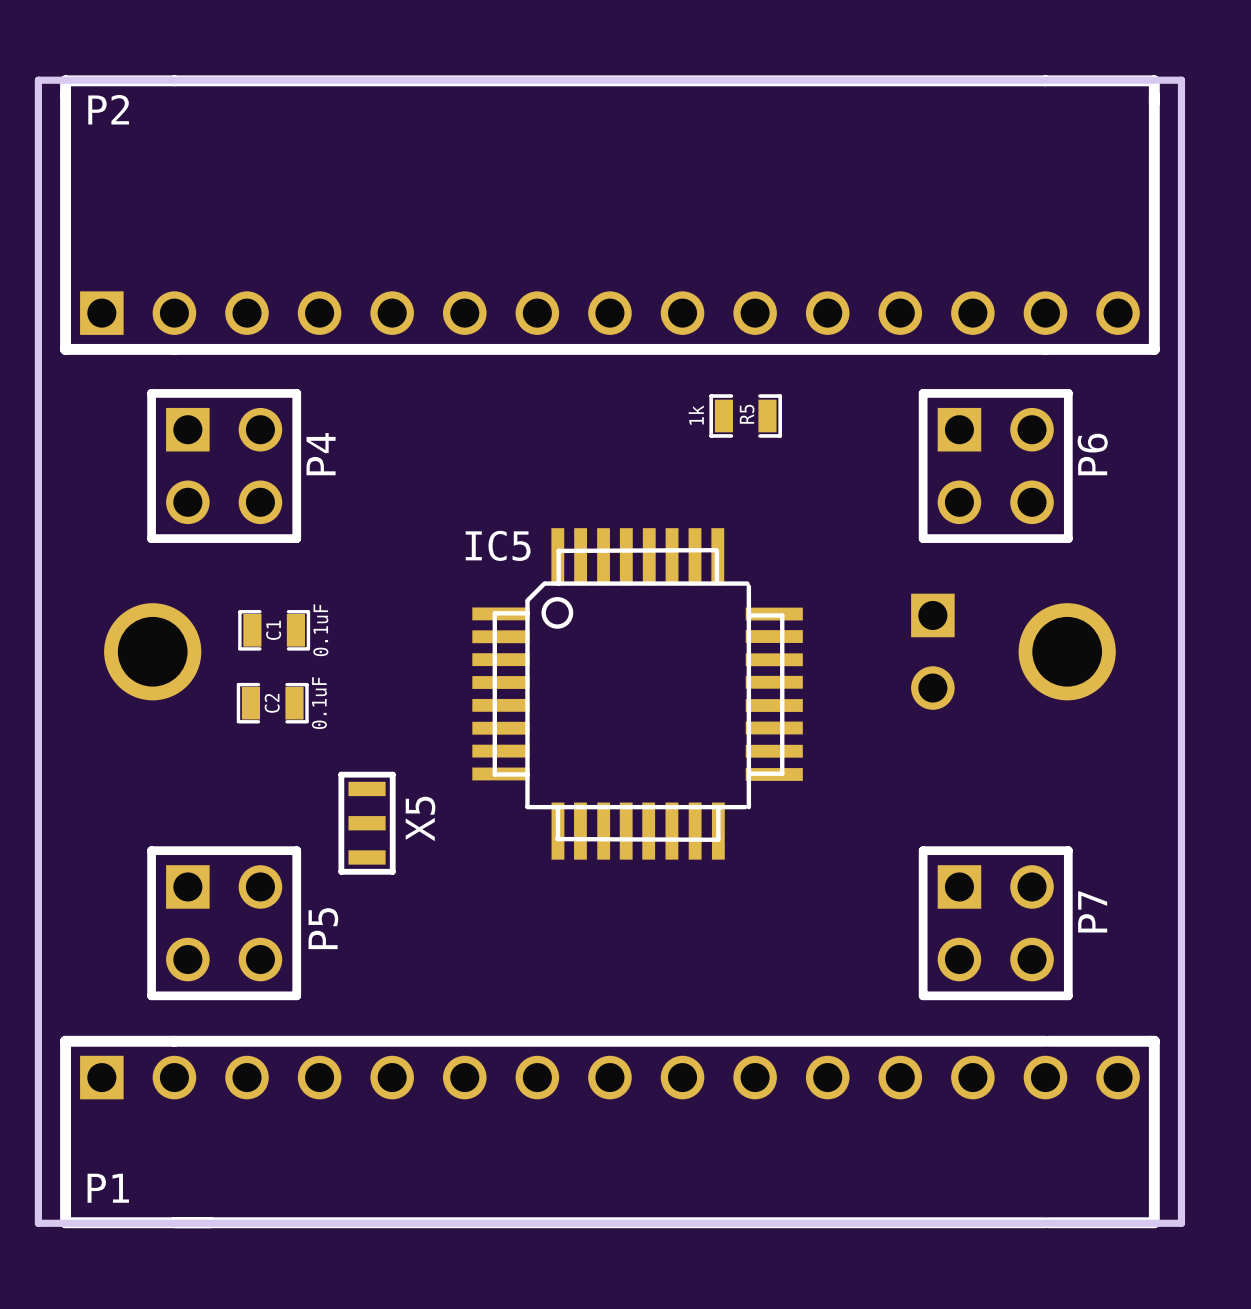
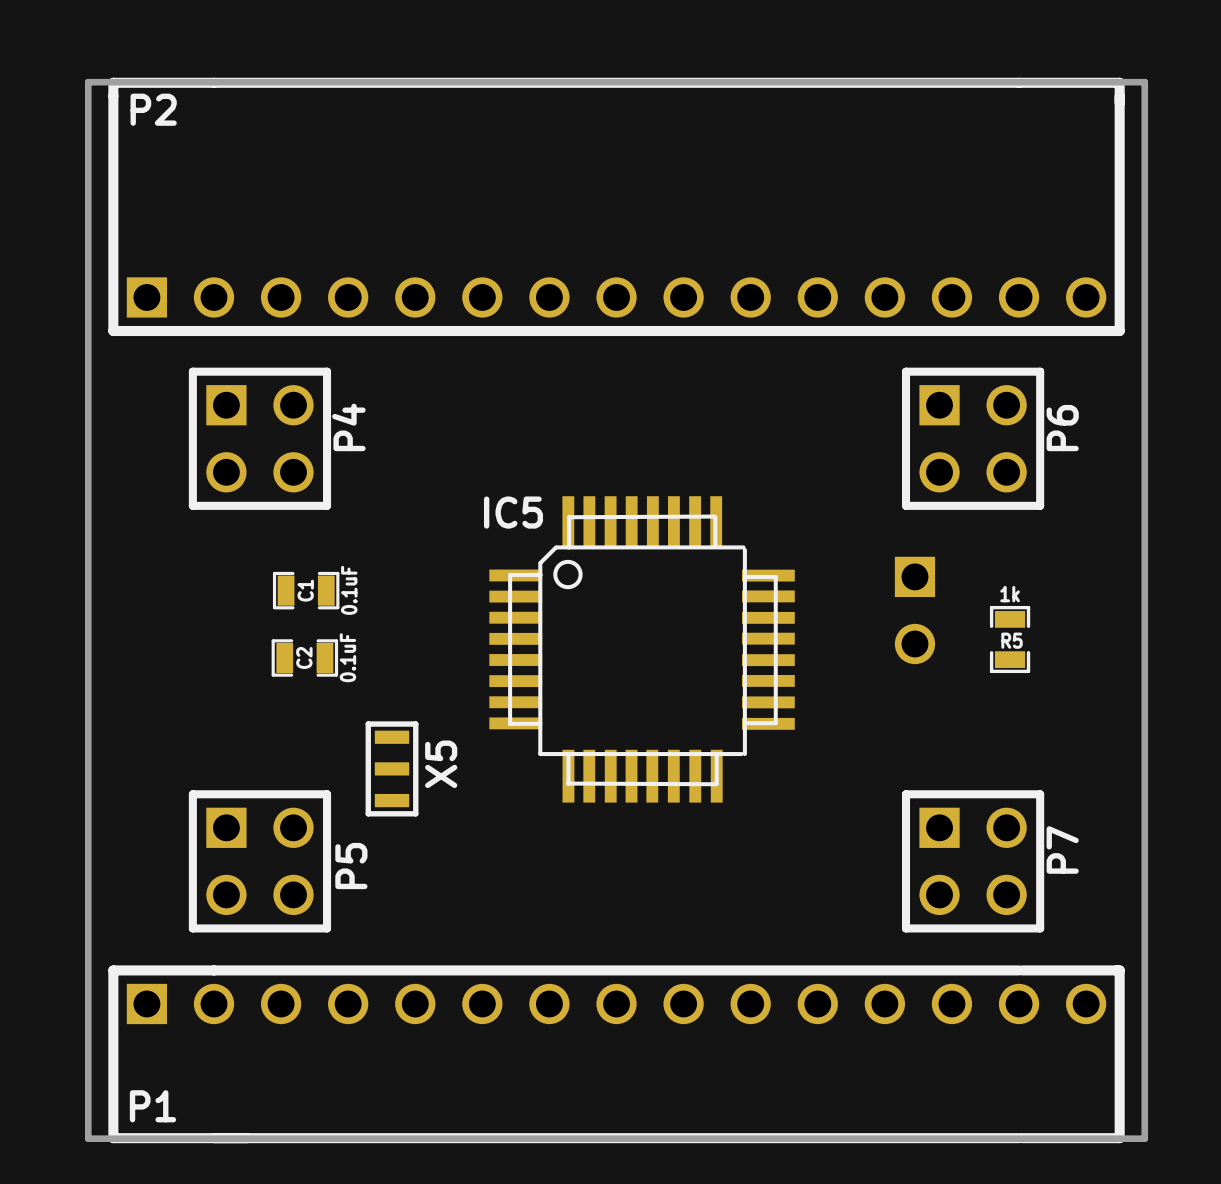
R5 rotation: 0° (745, 415) -> 90° clockwise (1010, 639)
R5 position: (745, 415) -> (1010, 639)
part: (152, 651) -> none
part: (1067, 651) -> none

